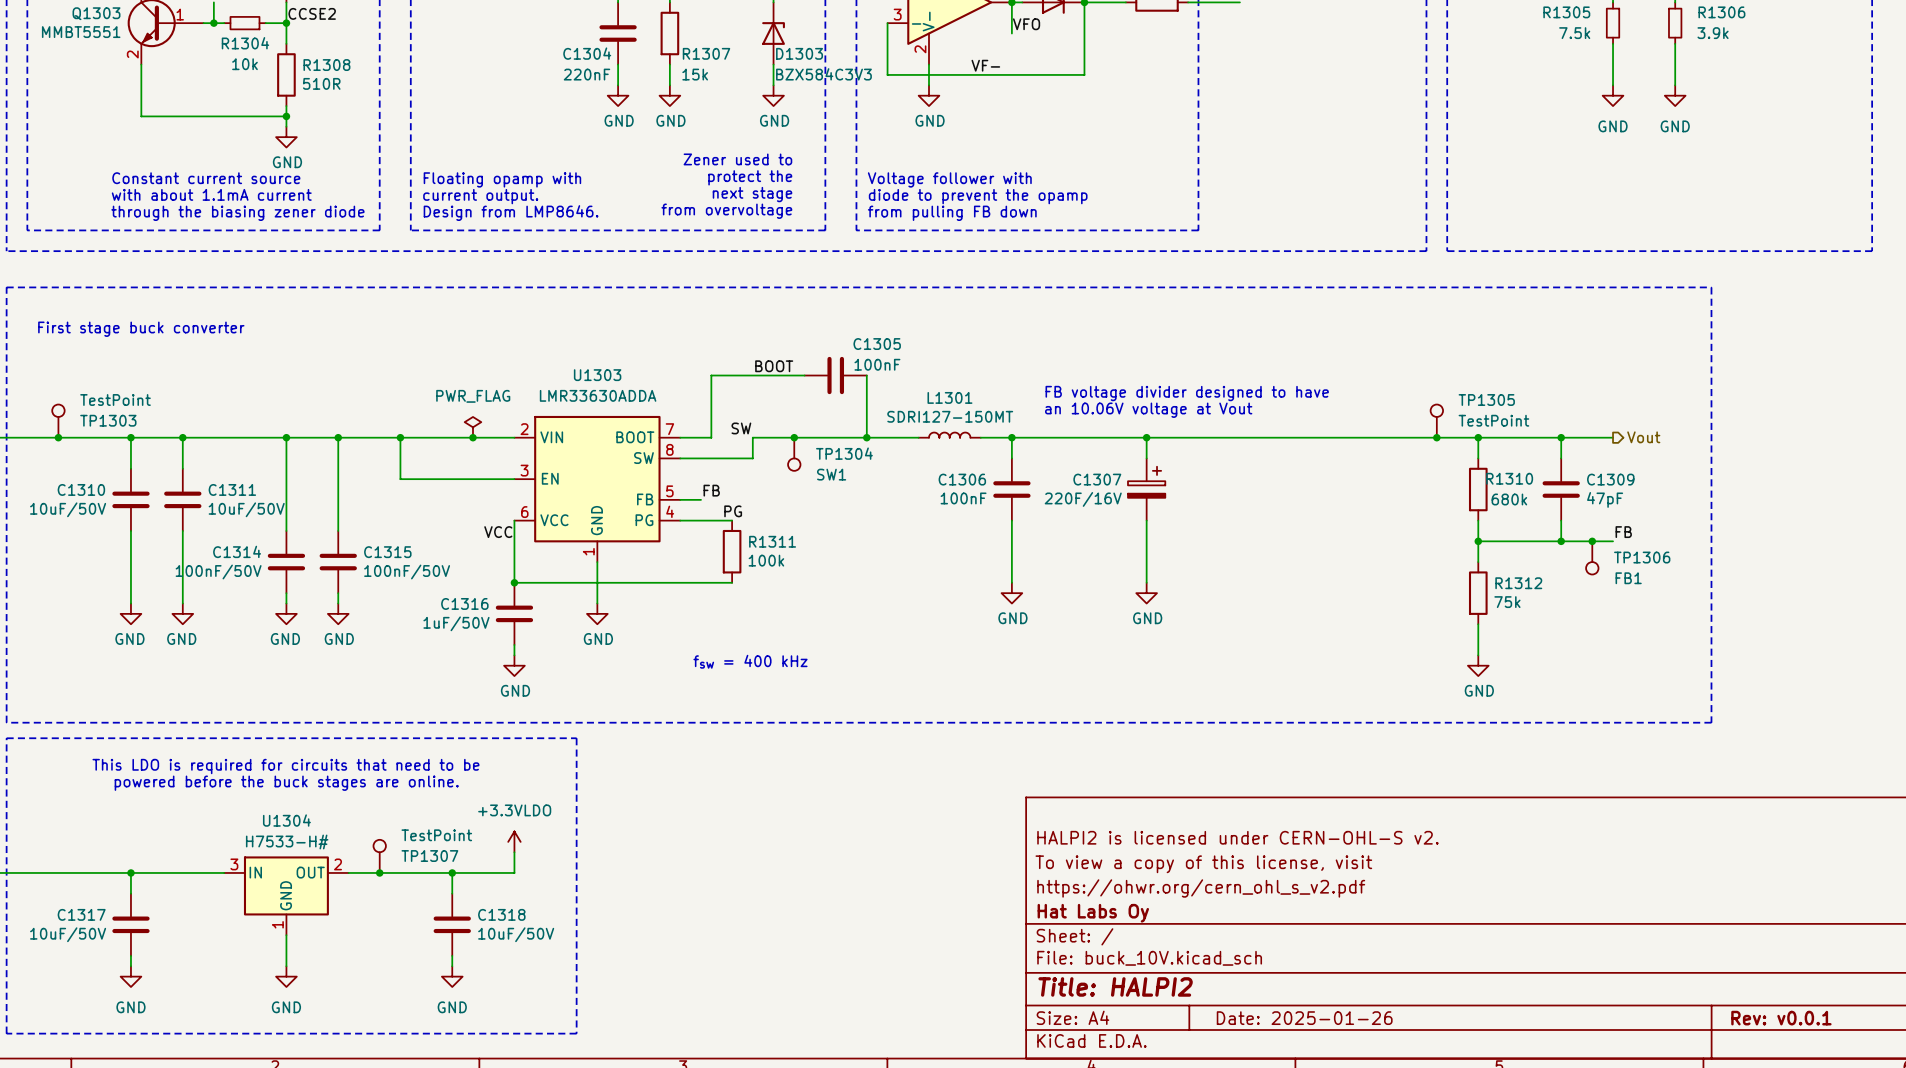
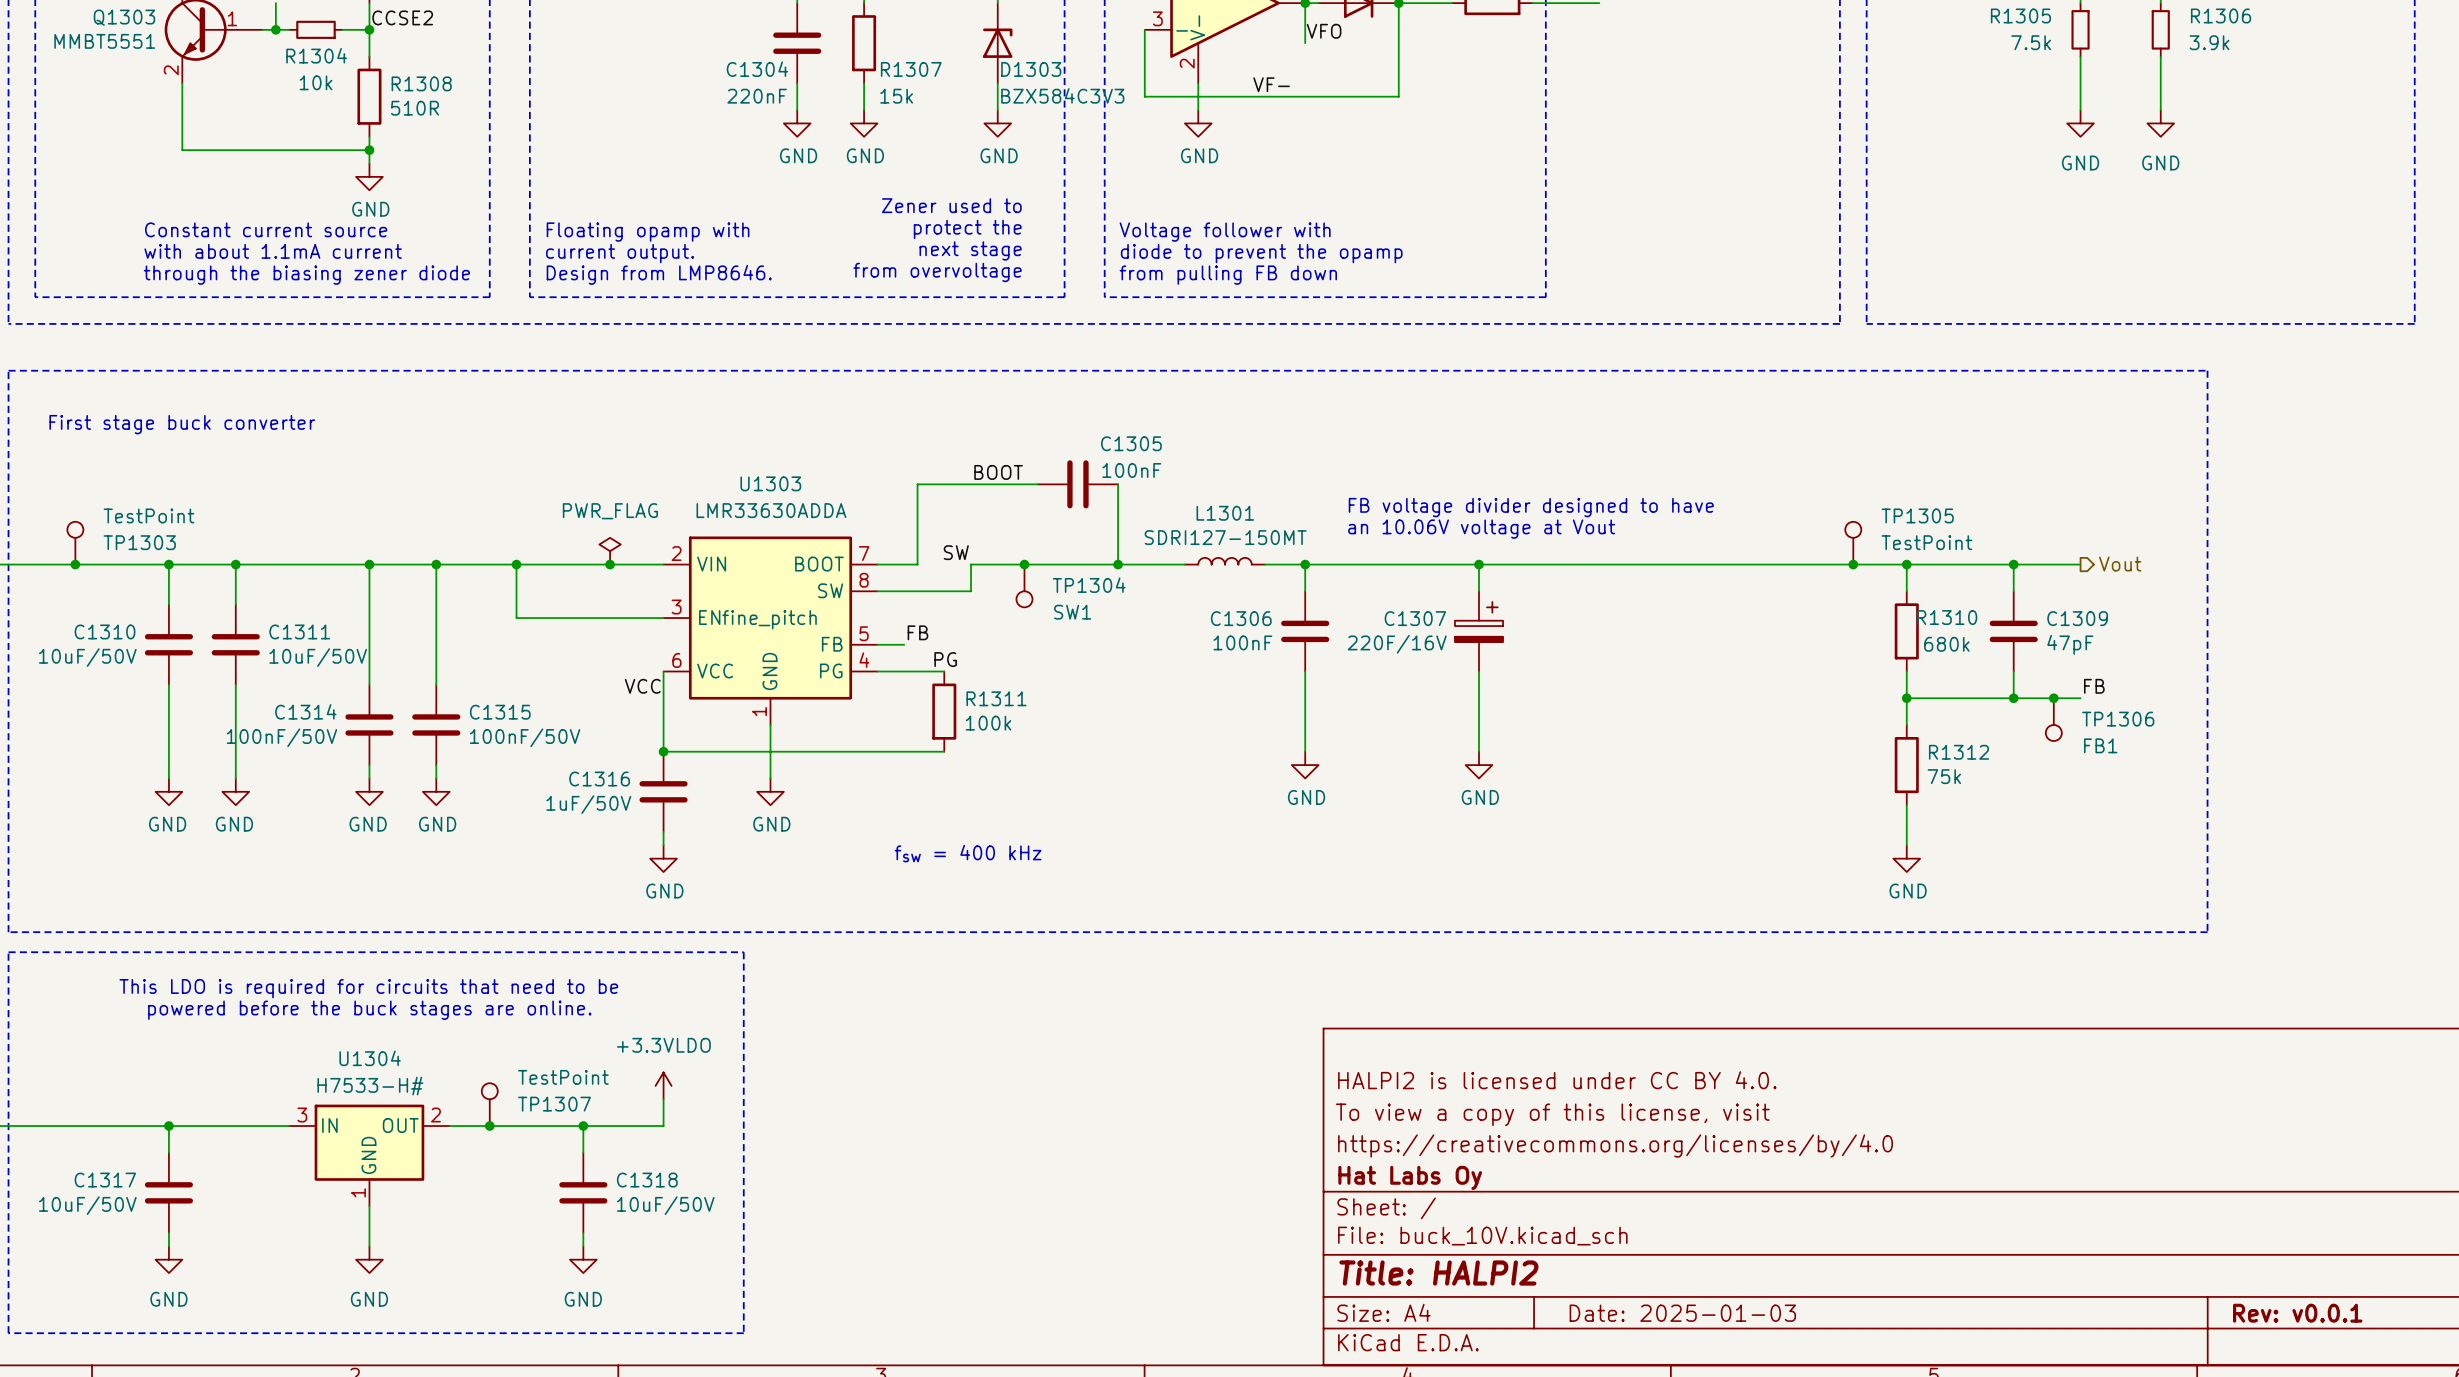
U1303 text: none -> fine_pitch (769, 619)
title block: HALPI2 is licensed under CERN-OHL-S v2. (1237, 837) -> HALPI2 is licensed under CC BY 4.0. (1557, 1080)
title block: https://ohwr.org/cern_ohl_s_v2.pdf (1201, 888) -> https://creativecommons.org/licenses/by/4.0 (1615, 1145)
title block: Date: 2025-01-26 (1304, 1018) -> Date: 2025-01-03 (1682, 1313)

